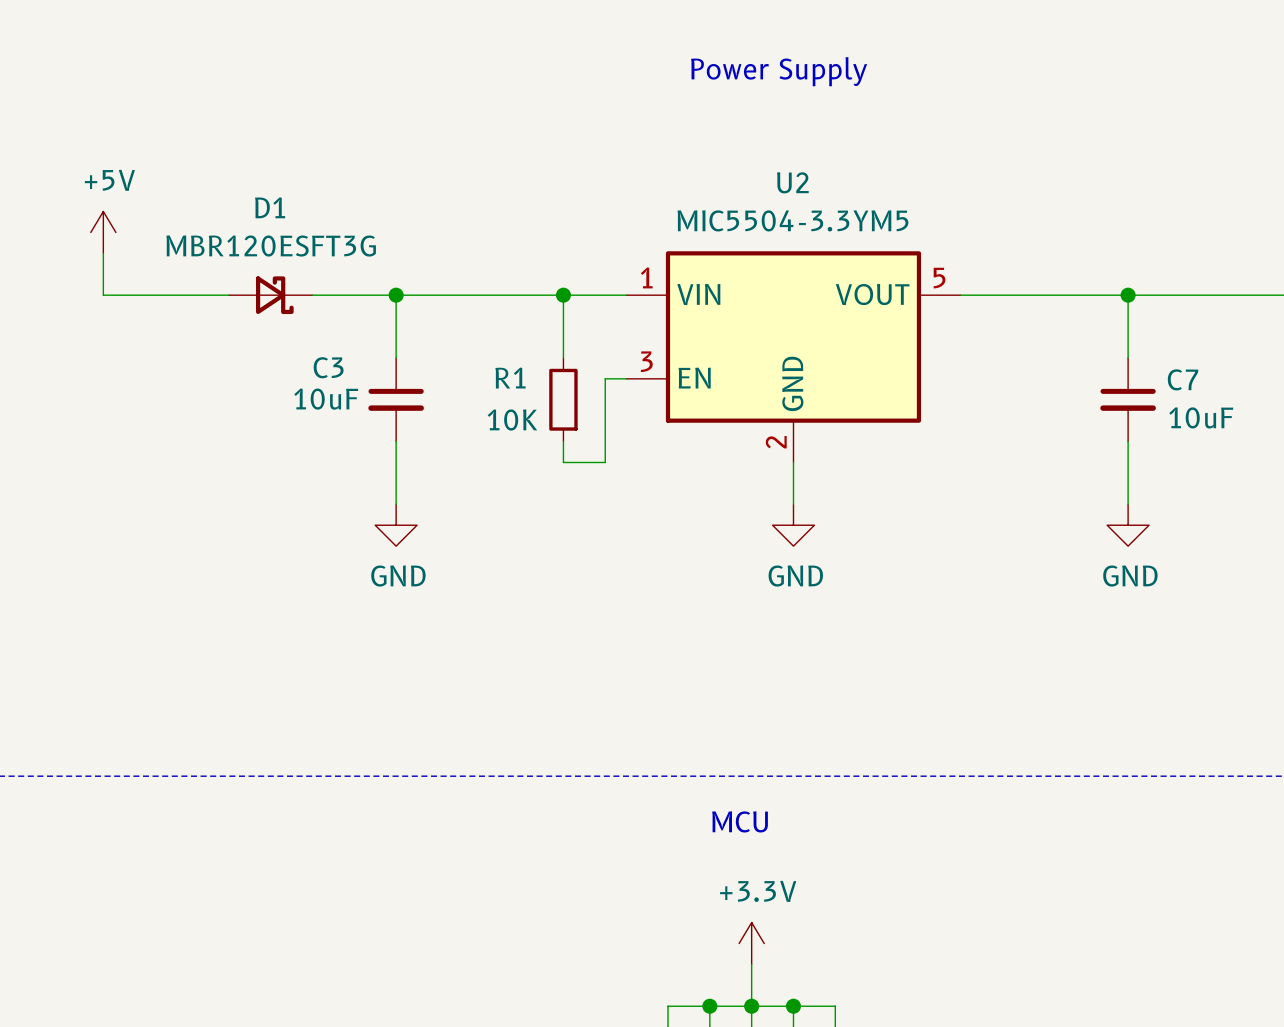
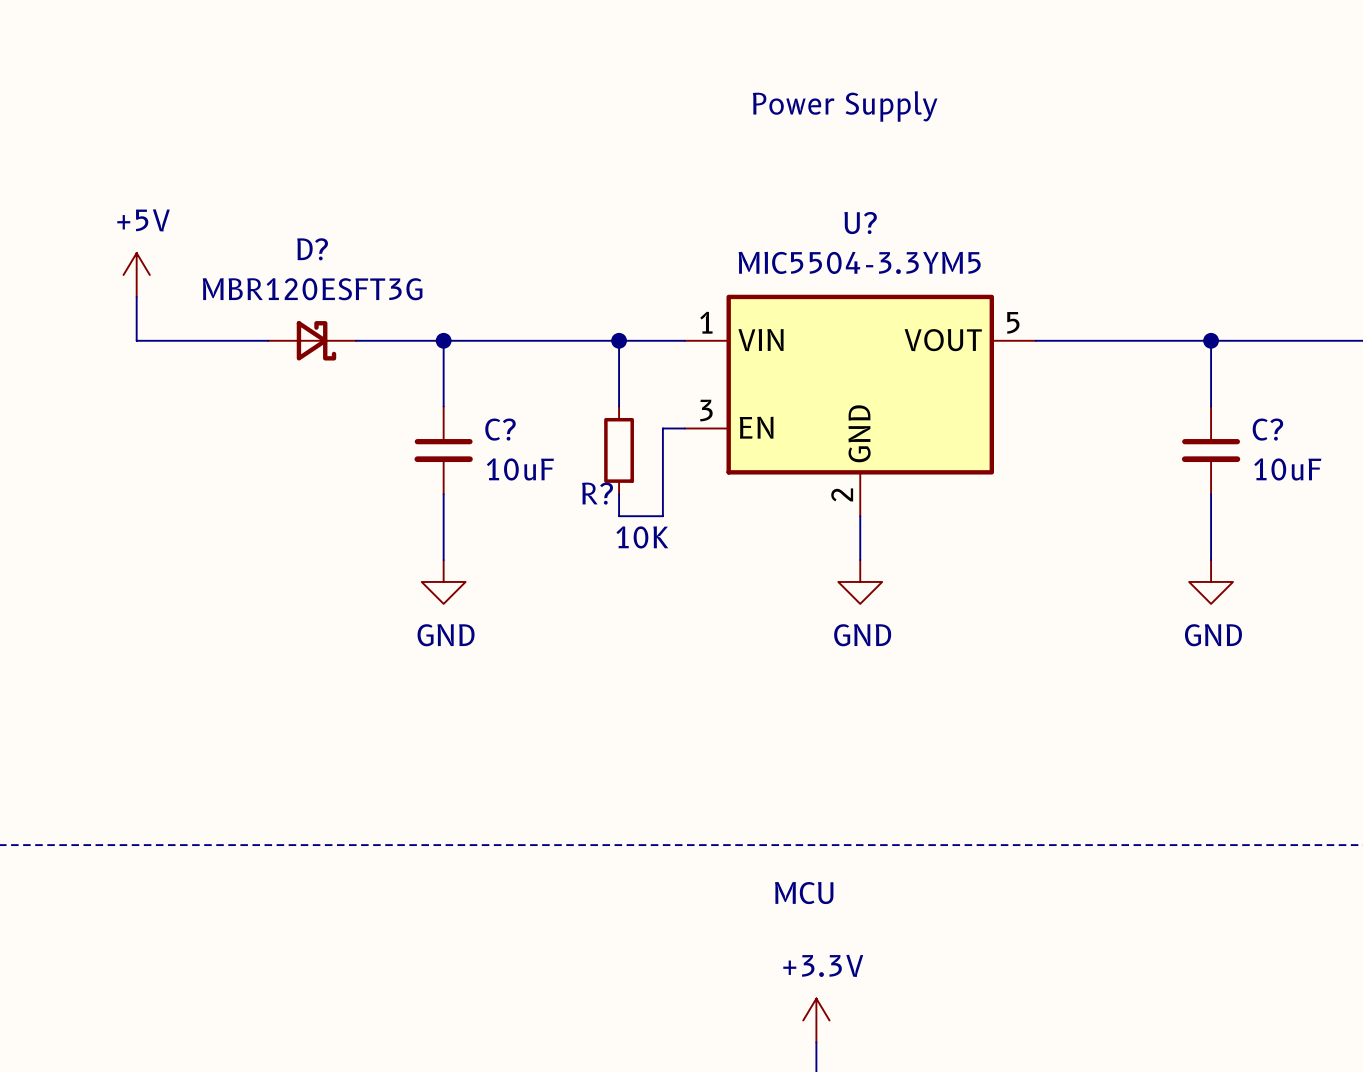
U2 name: U2 (792, 182) -> U? (860, 223)
D1 name: D1 (270, 207) -> D? (312, 249)
C3 name: C3 (328, 367) -> C? (500, 429)
R1 name: R1 (510, 378) -> R? (597, 493)
C7 name: C7 (1183, 379) -> C? (1267, 429)
C3 value position: 10uF (326, 399) -> 10uF (520, 469)
R1 value position: 10K (512, 420) -> 10K (642, 537)

